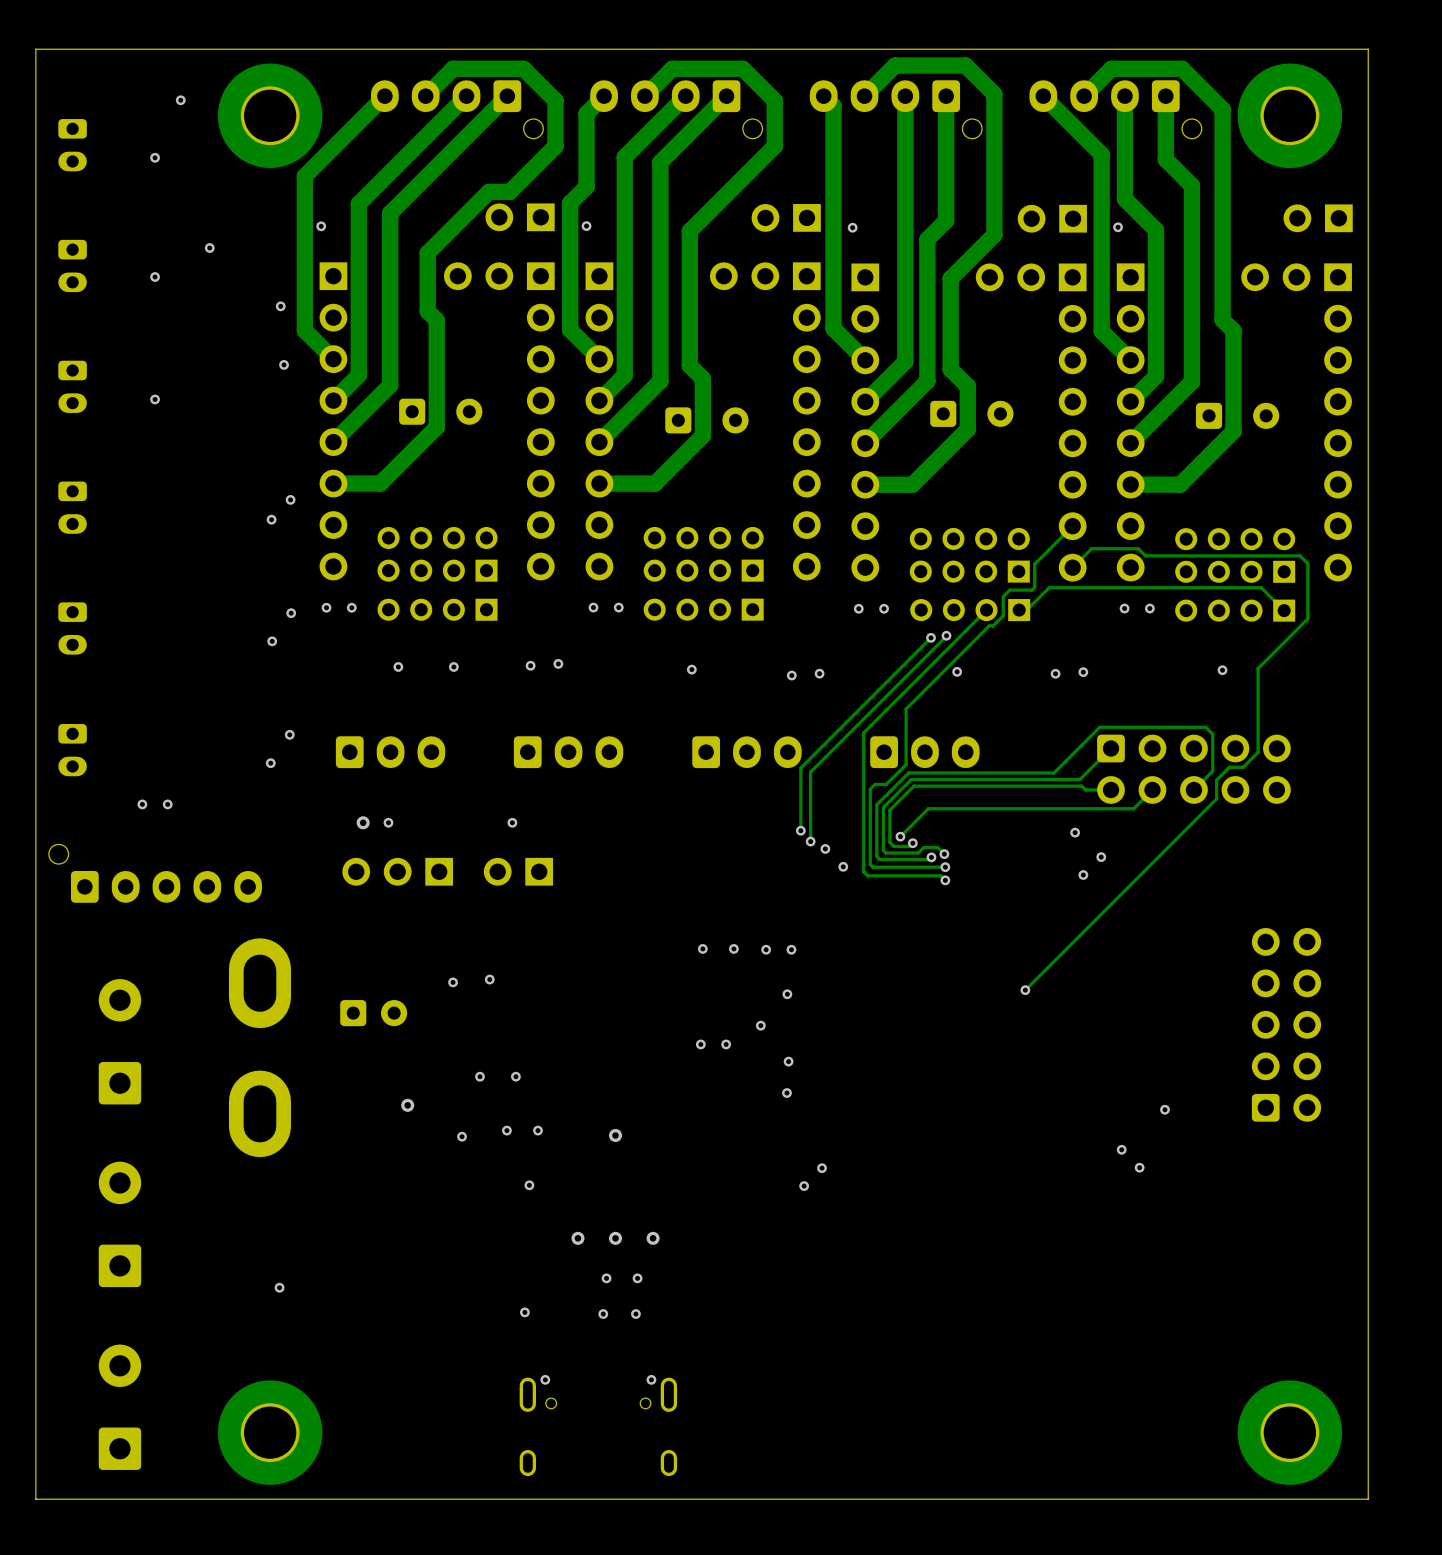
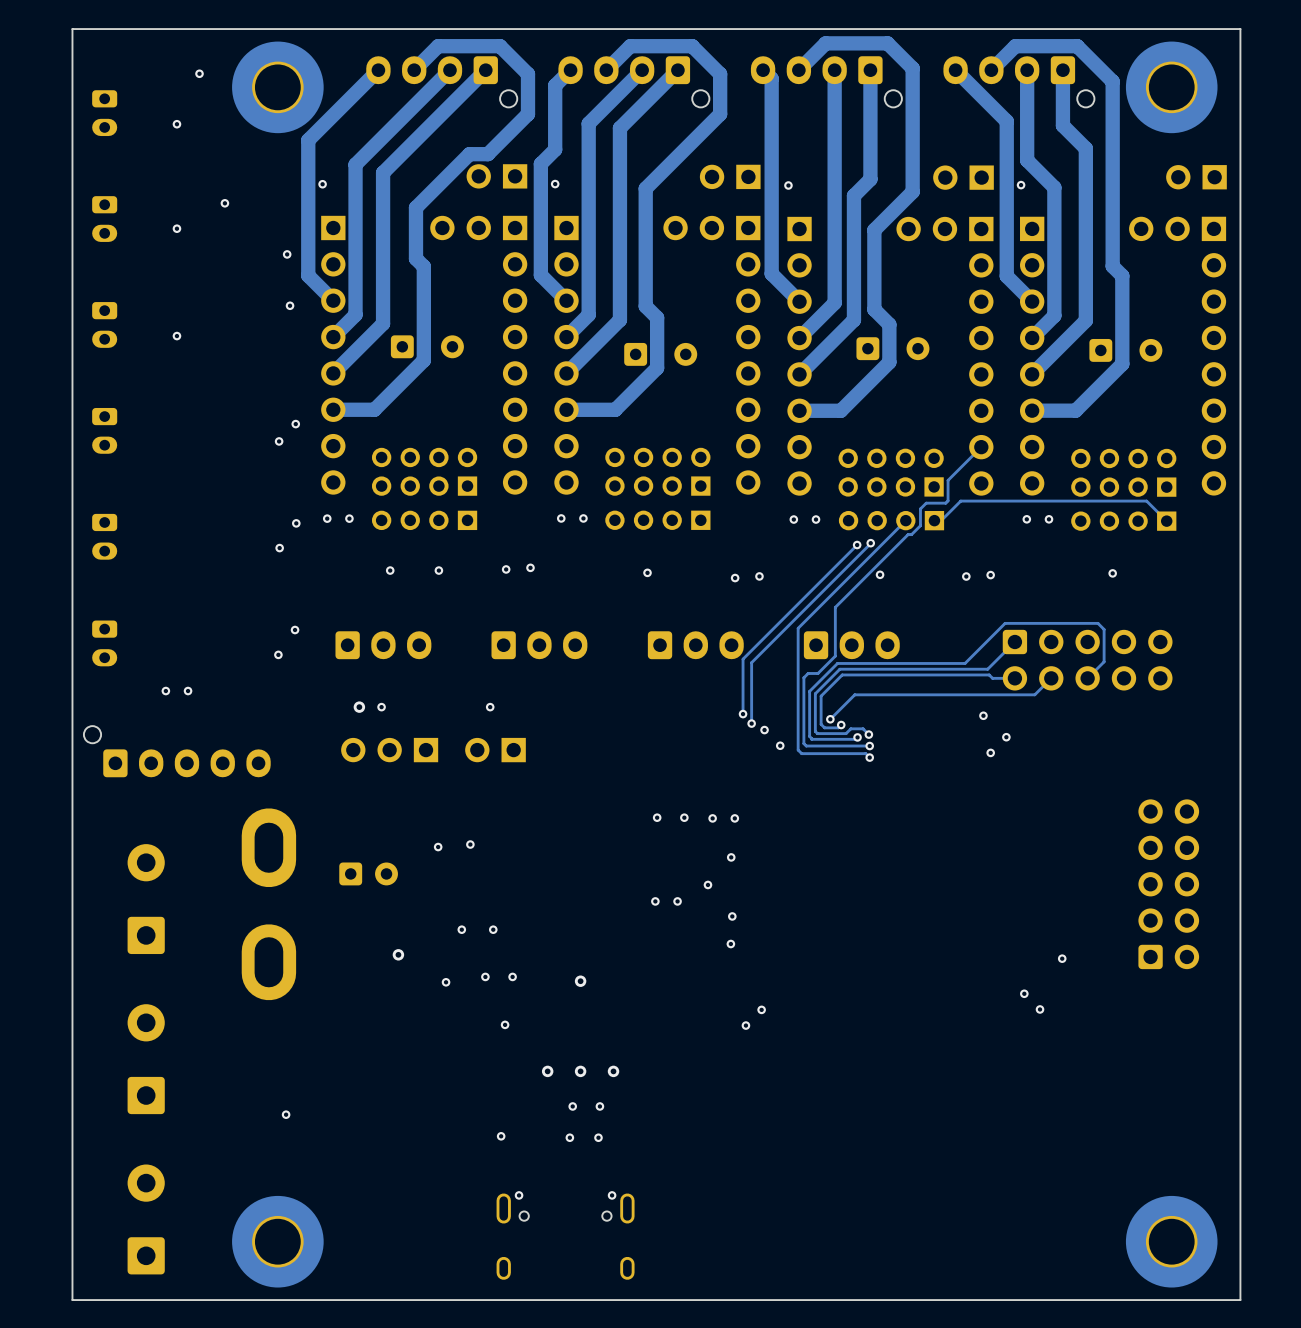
track: (1072, 567) (1091, 548) (1138, 548) (1145, 555) (1300, 555) (1307, 563) (1307, 618) (1258, 668) (1258, 752) (1243, 767) (1229, 767) (1216, 780) (1216, 798) (1025, 990) -> none
via: (1025, 990) -> none

